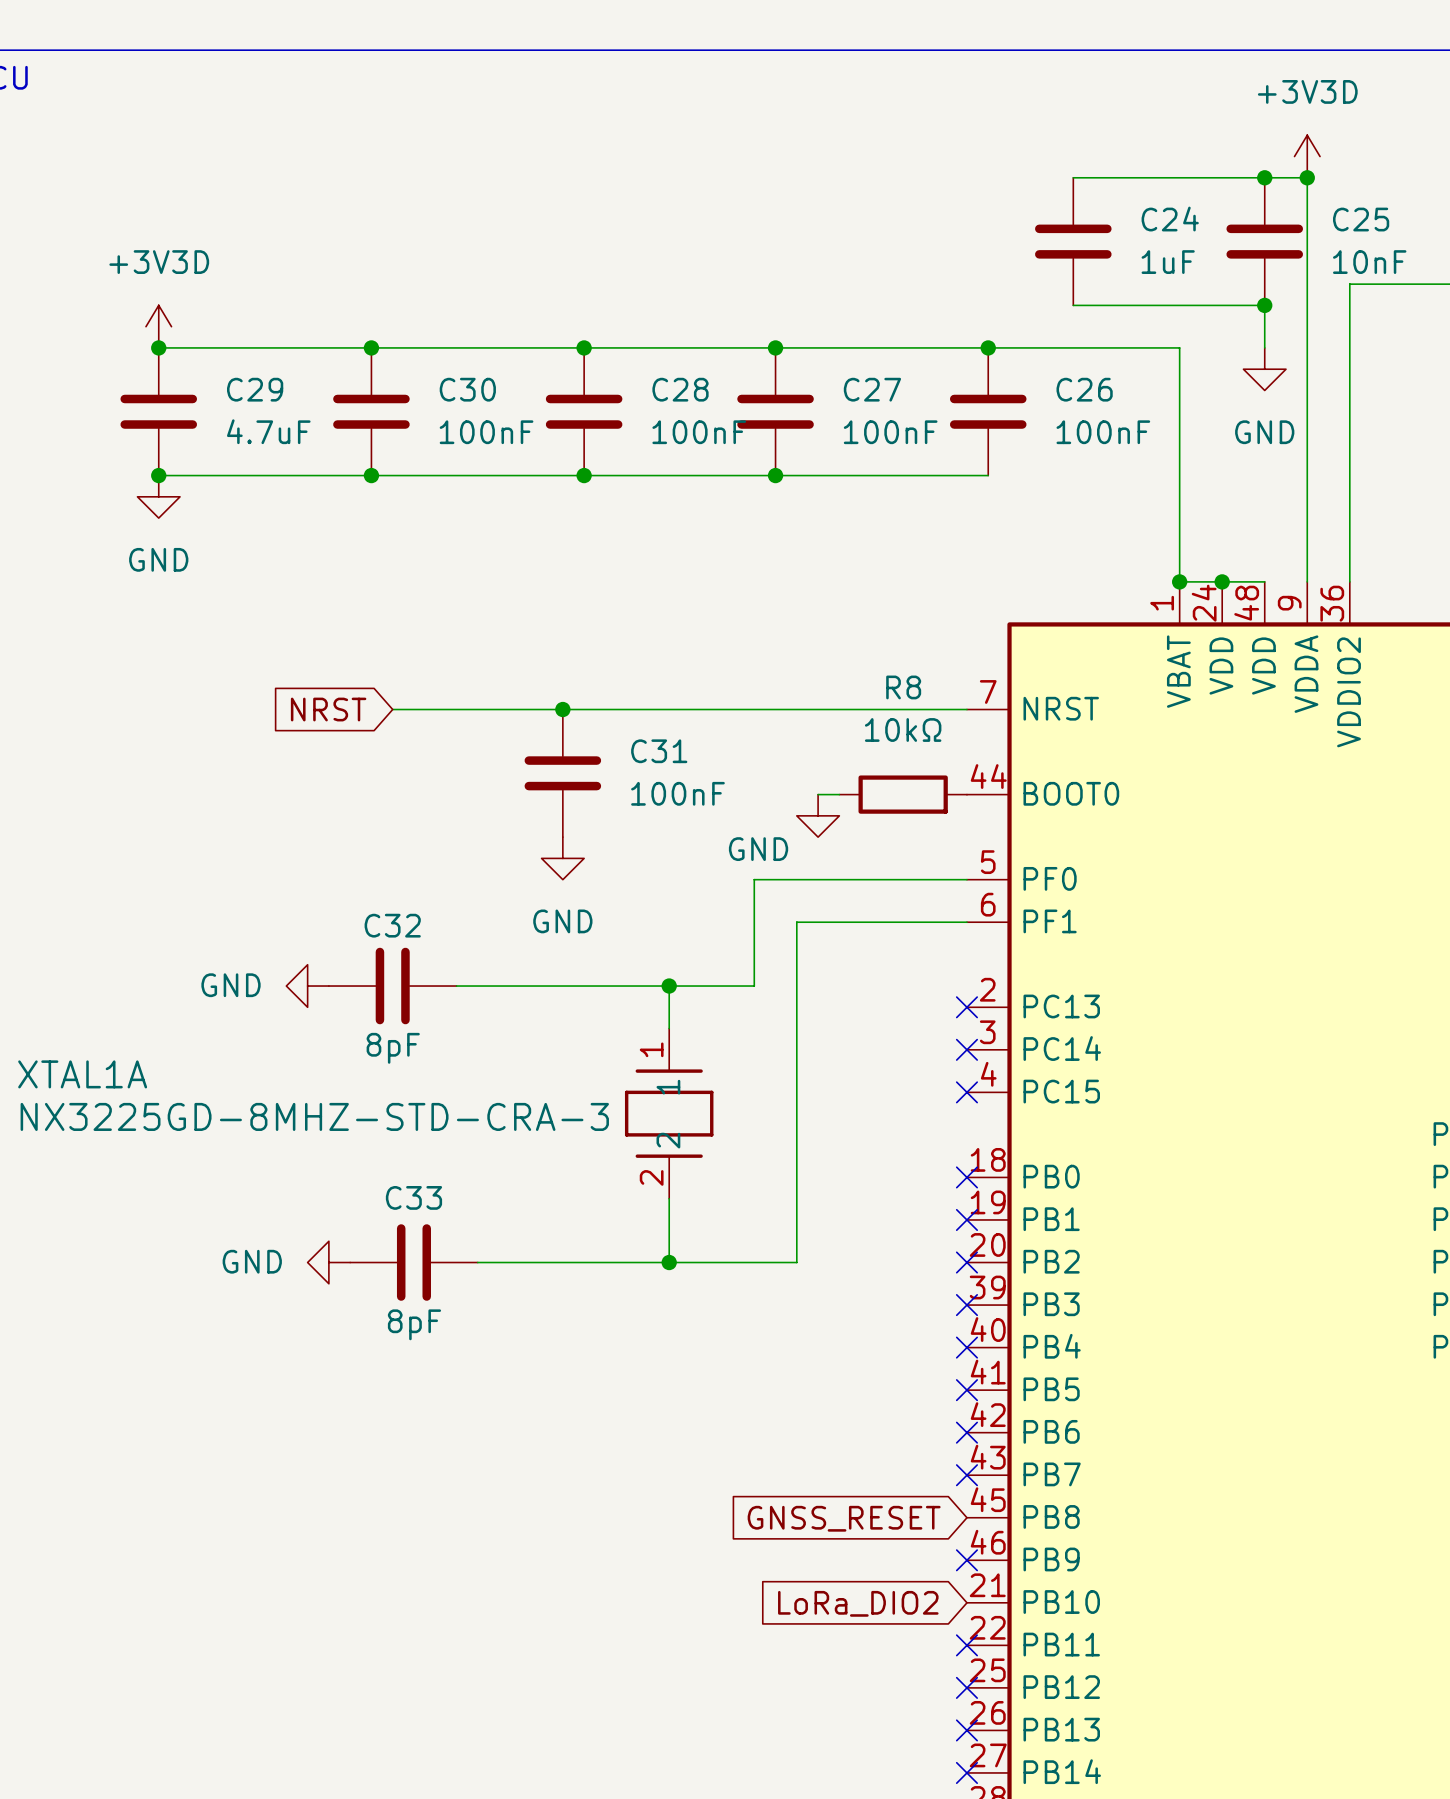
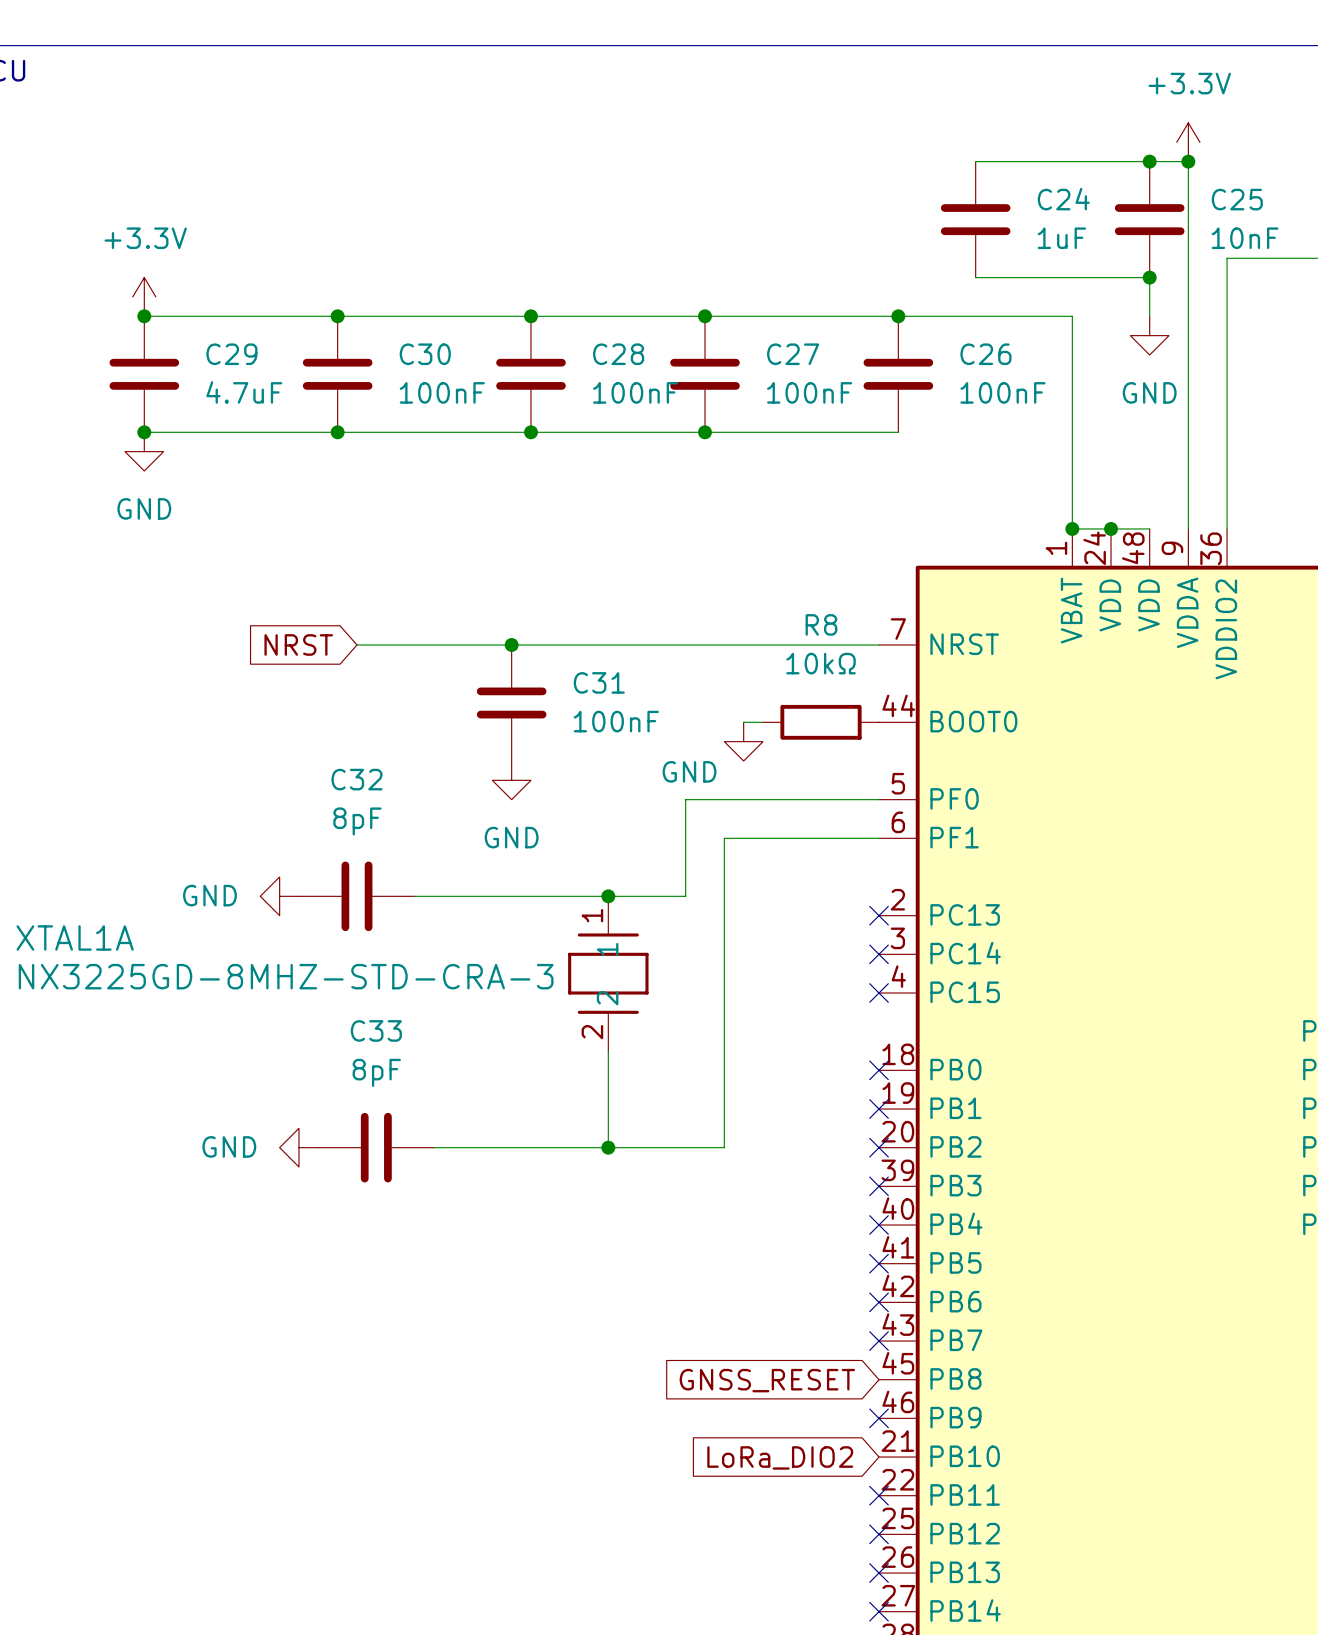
power symbol: +3V3D (1307, 156) -> +3.3V (1188, 142)
power symbol: +3V3D (158, 326) -> +3.3V (144, 296)
C32 name position: C32 (392, 925) -> C32 (356, 779)
C32 value position: 8pF (393, 1048) -> 8pF (357, 821)
XTAL1A position: (669, 1113) -> (608, 973)
C33 name position: C33 (413, 1197) -> C33 (376, 1030)
C33 value position: 8pF (414, 1324) -> 8pF (376, 1072)

